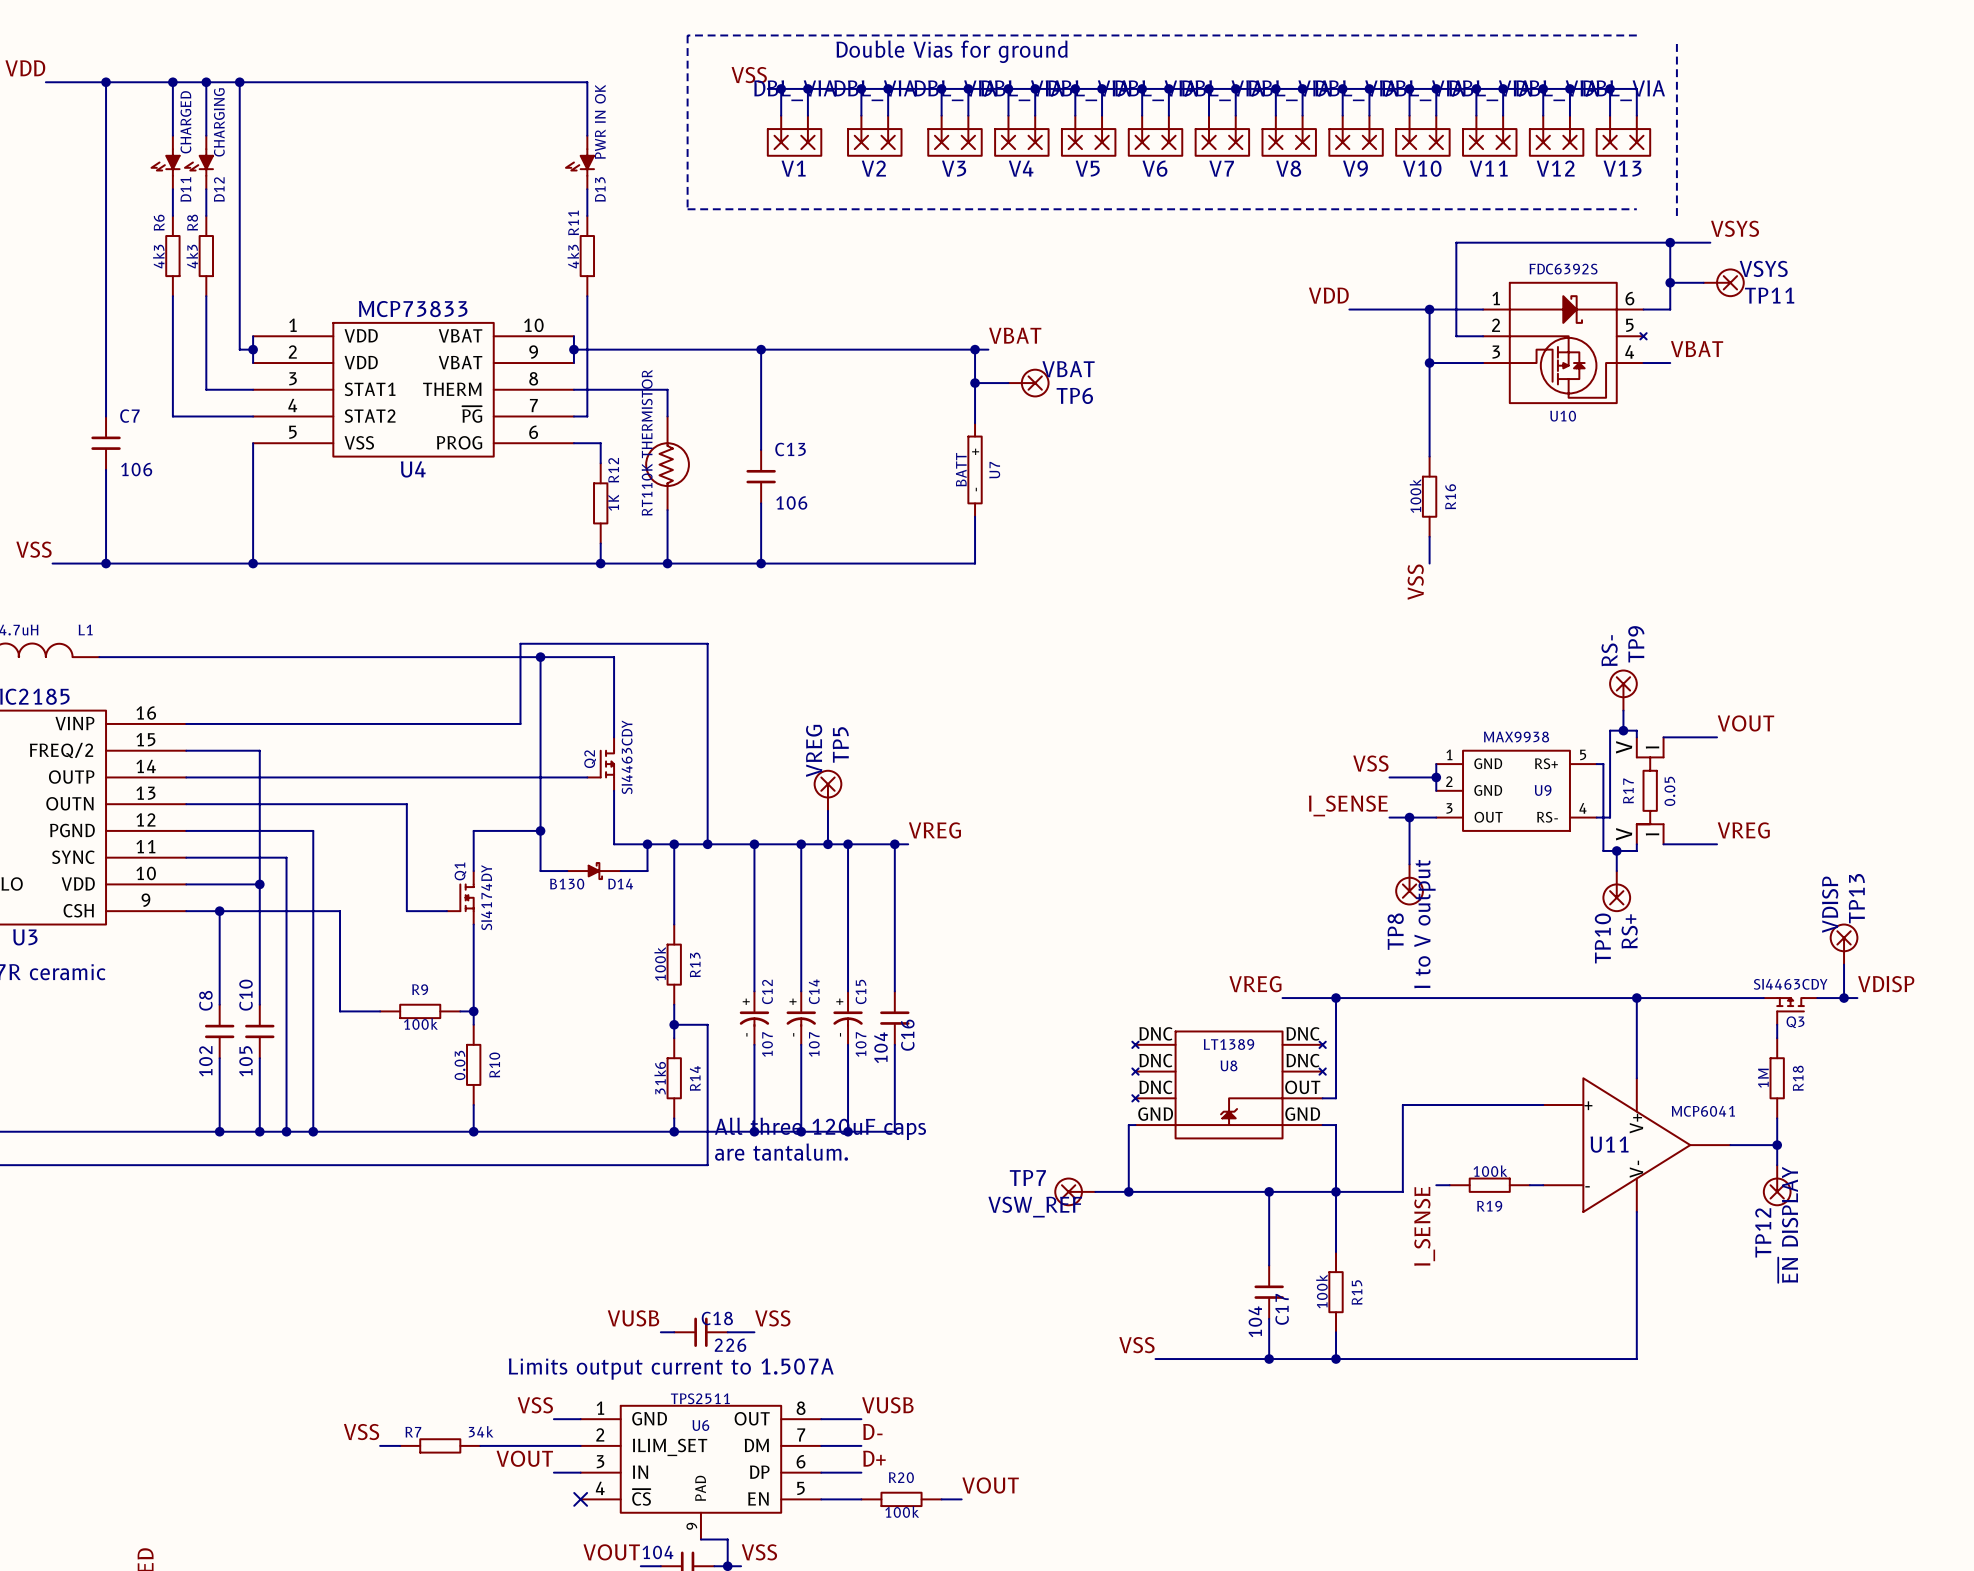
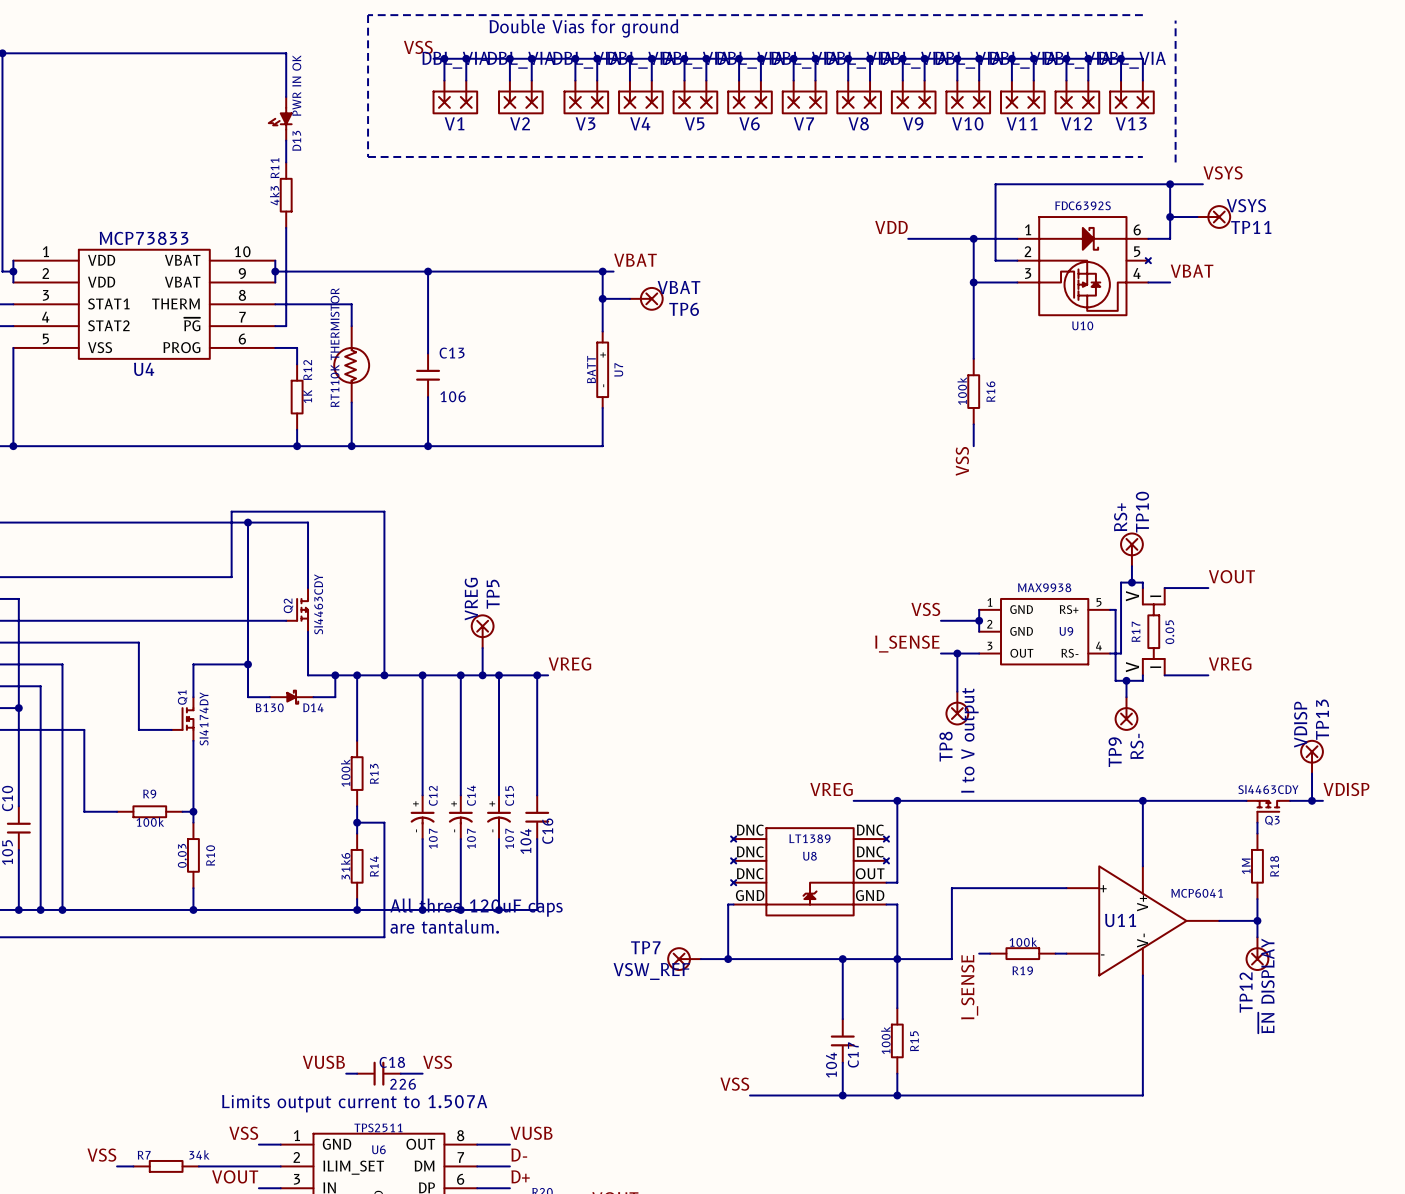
TP9 name: TP9 (1636, 644) -> TP10 (1142, 512)
TP9 value: RS- (1609, 650) -> RS+ (1120, 517)
TP10 value: RS+ (1629, 931) -> RS- (1137, 746)
TP10 name: TP10 (1602, 938) -> TP9 (1115, 752)

